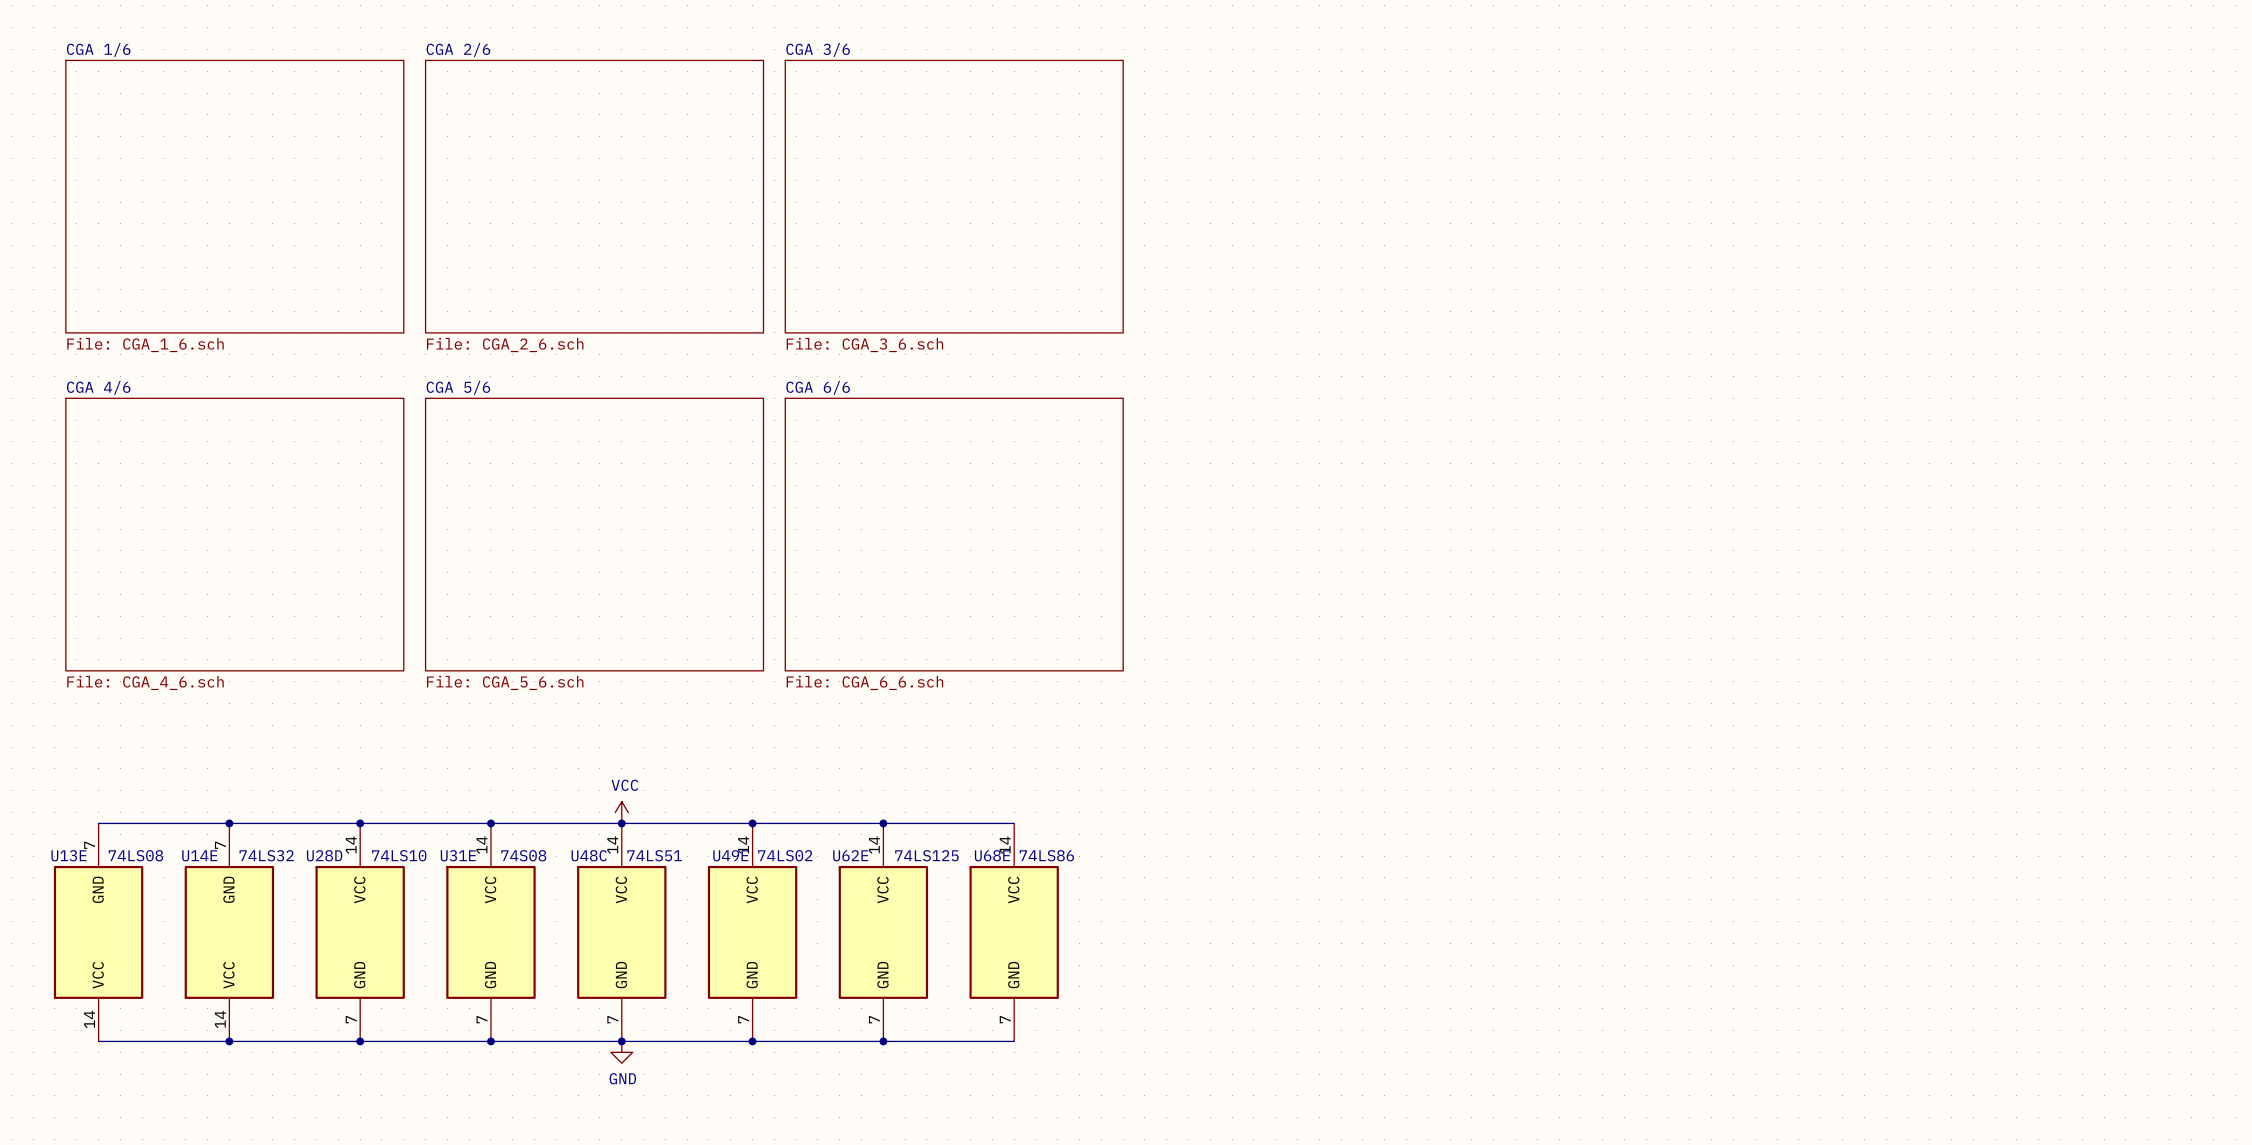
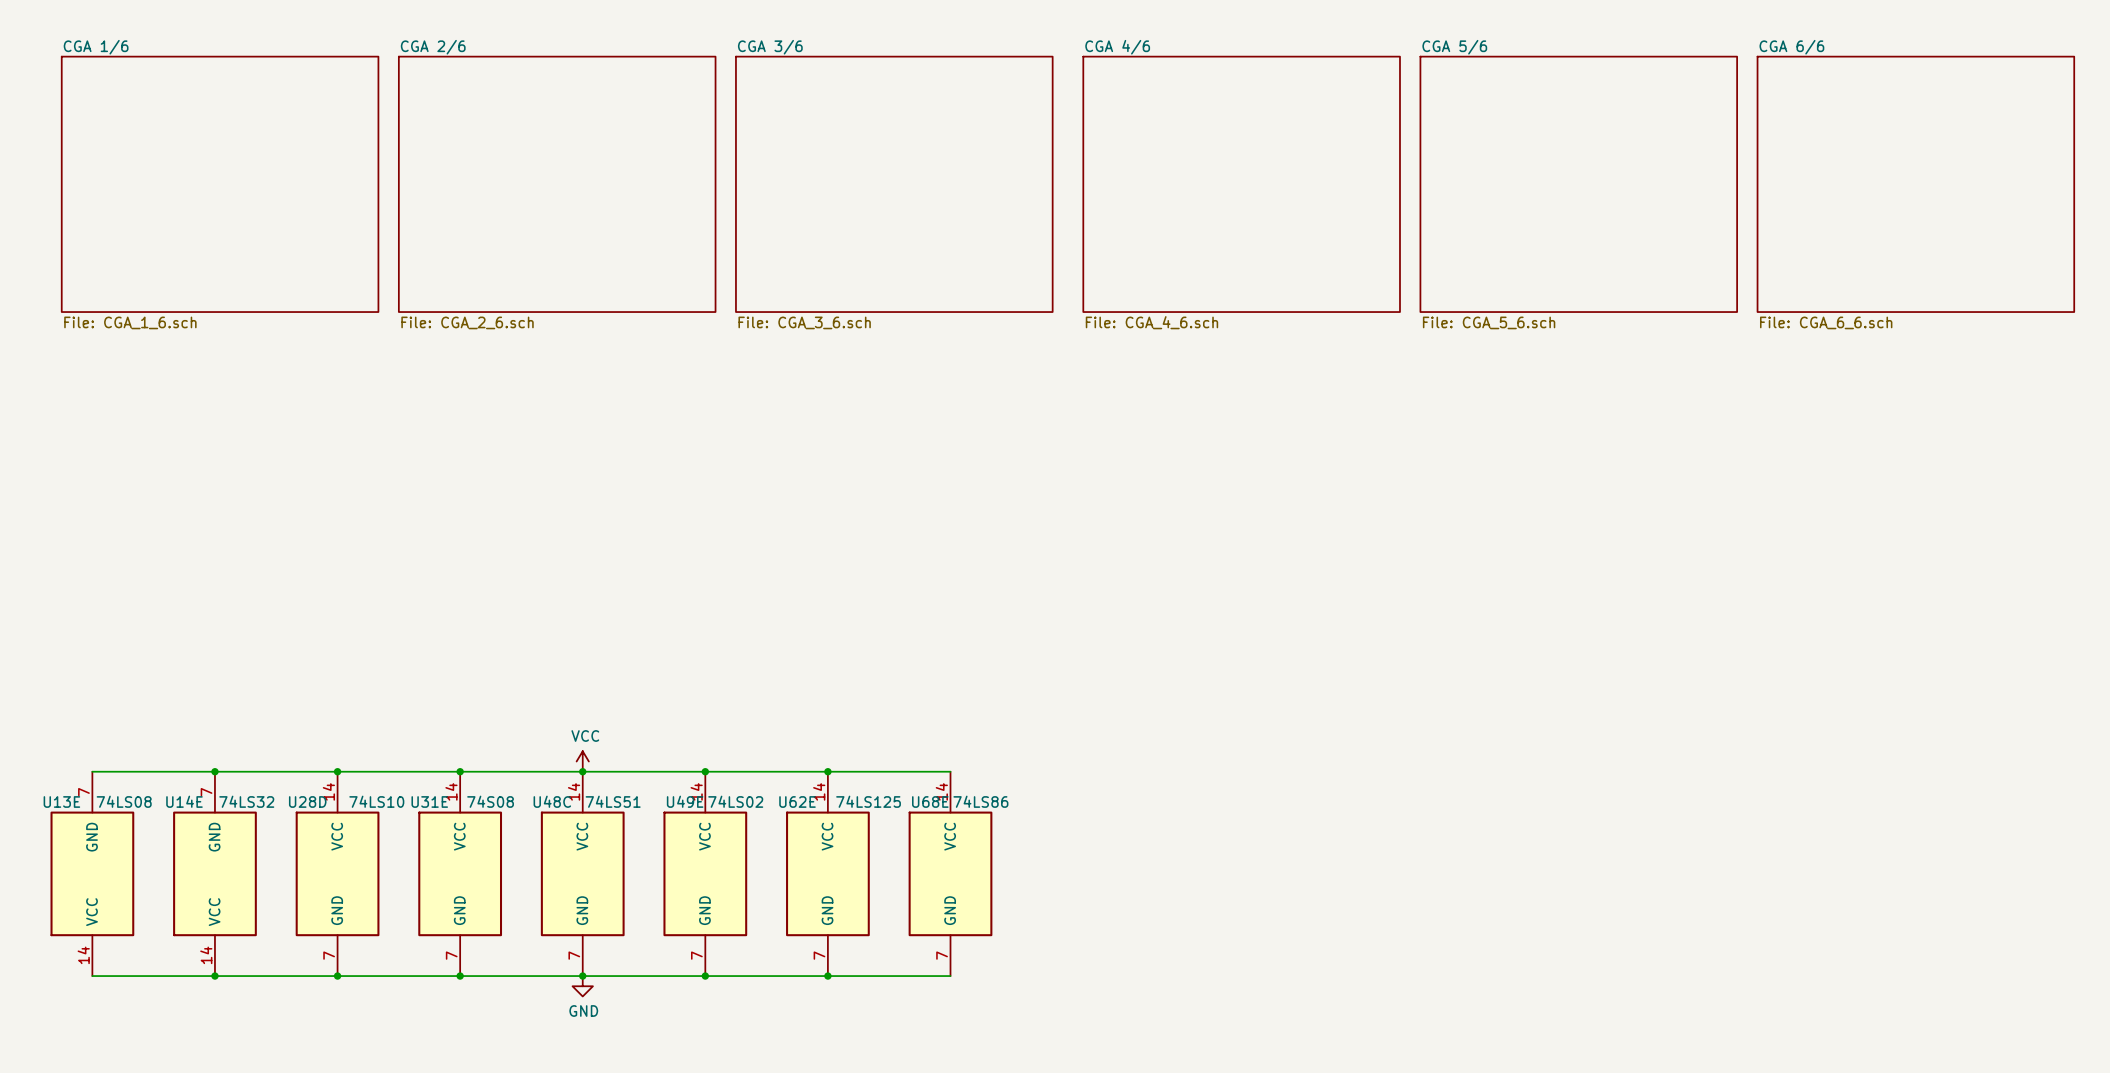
sheet CGA 4/6 position: (234, 534) -> (1241, 184)
sheet CGA 5/6 position: (594, 534) -> (1578, 184)
sheet CGA 6/6 position: (954, 534) -> (1915, 184)

